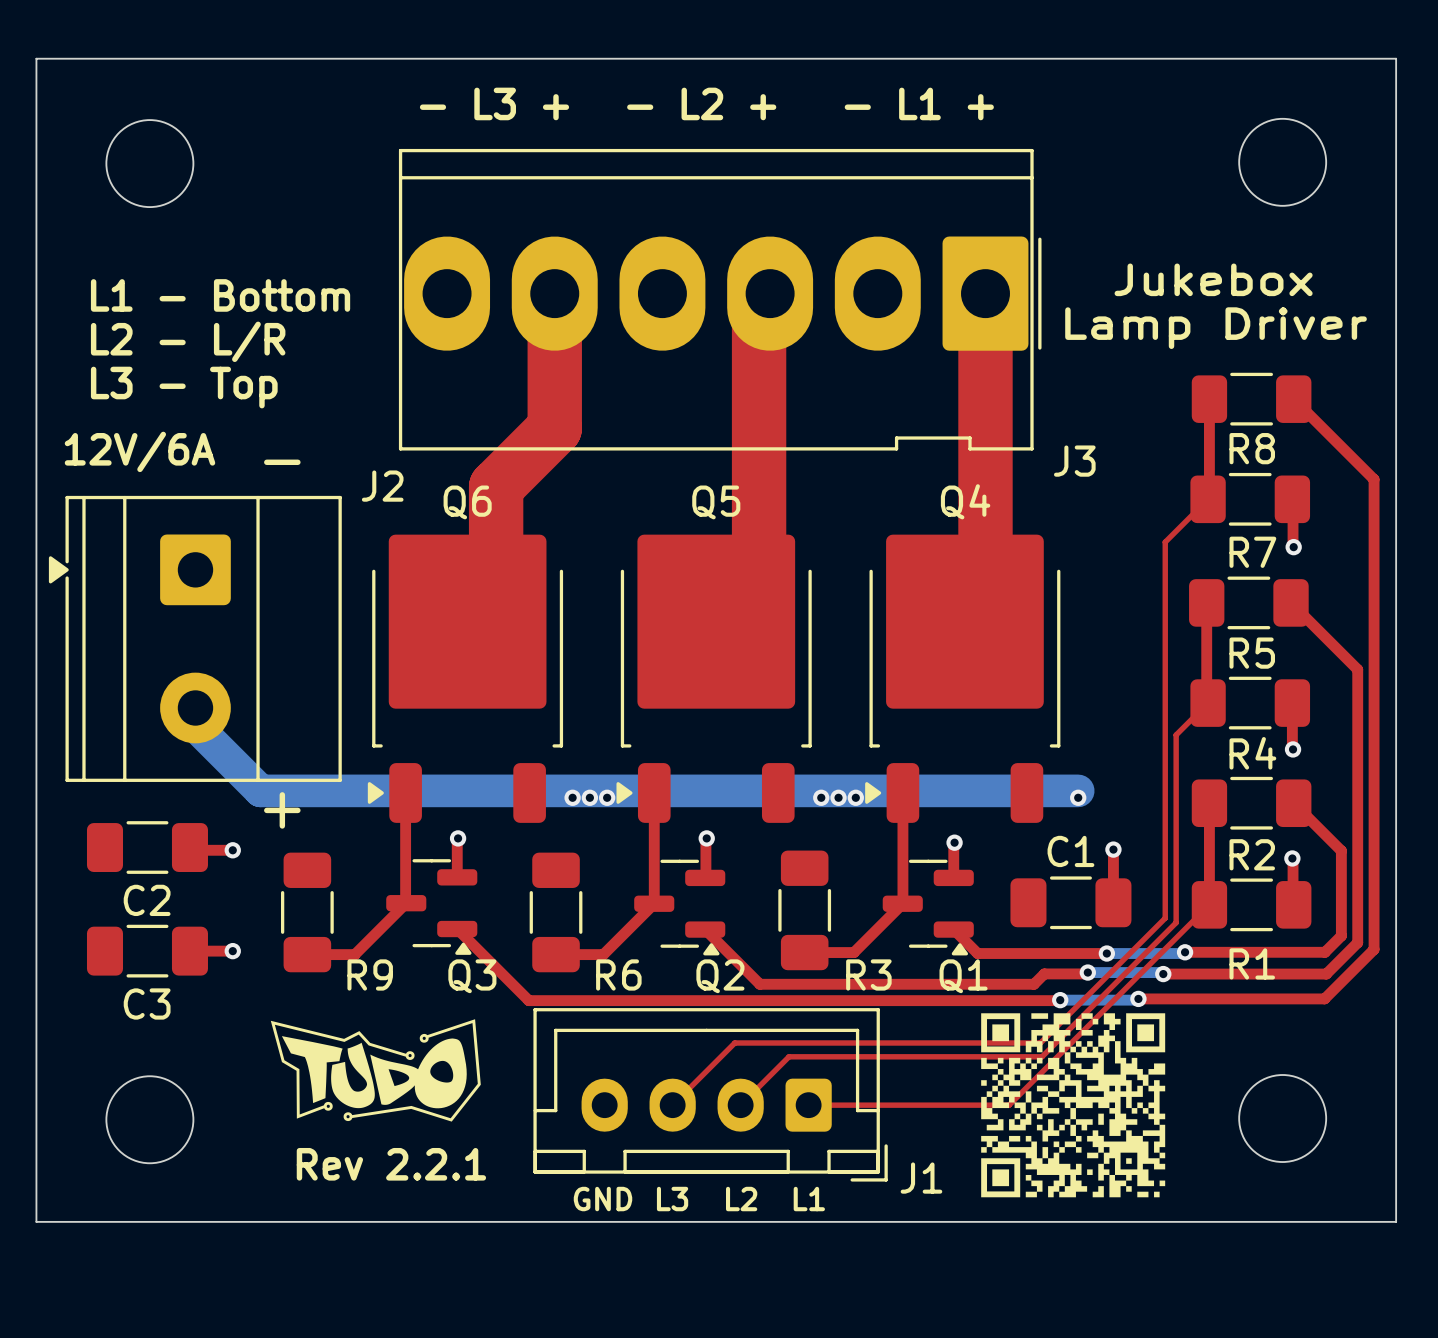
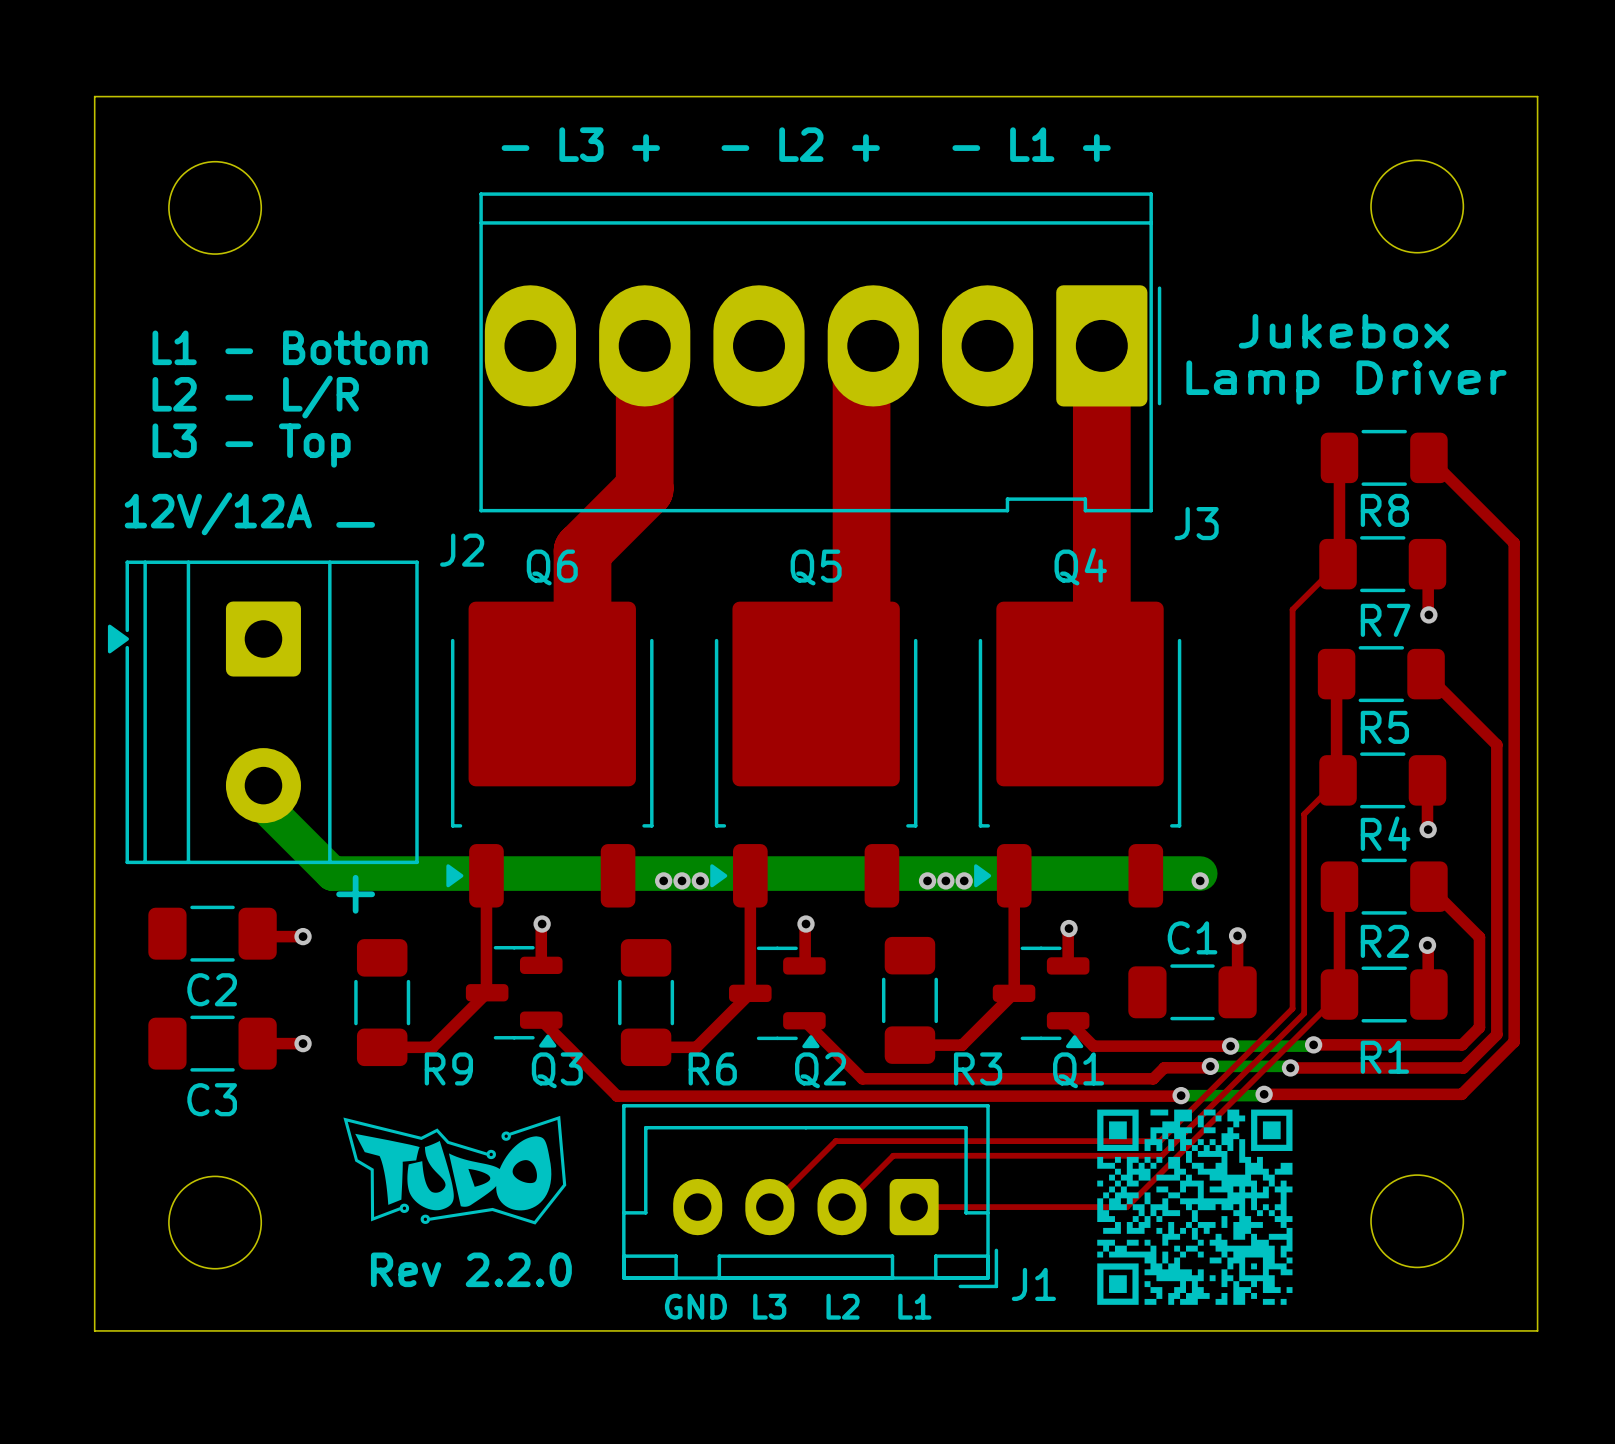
text: 12V/6A (139, 451) -> 12V/12A (218, 513)
text: Rev 2.2.1 (391, 1164) -> Rev 2.2.0 (471, 1269)

